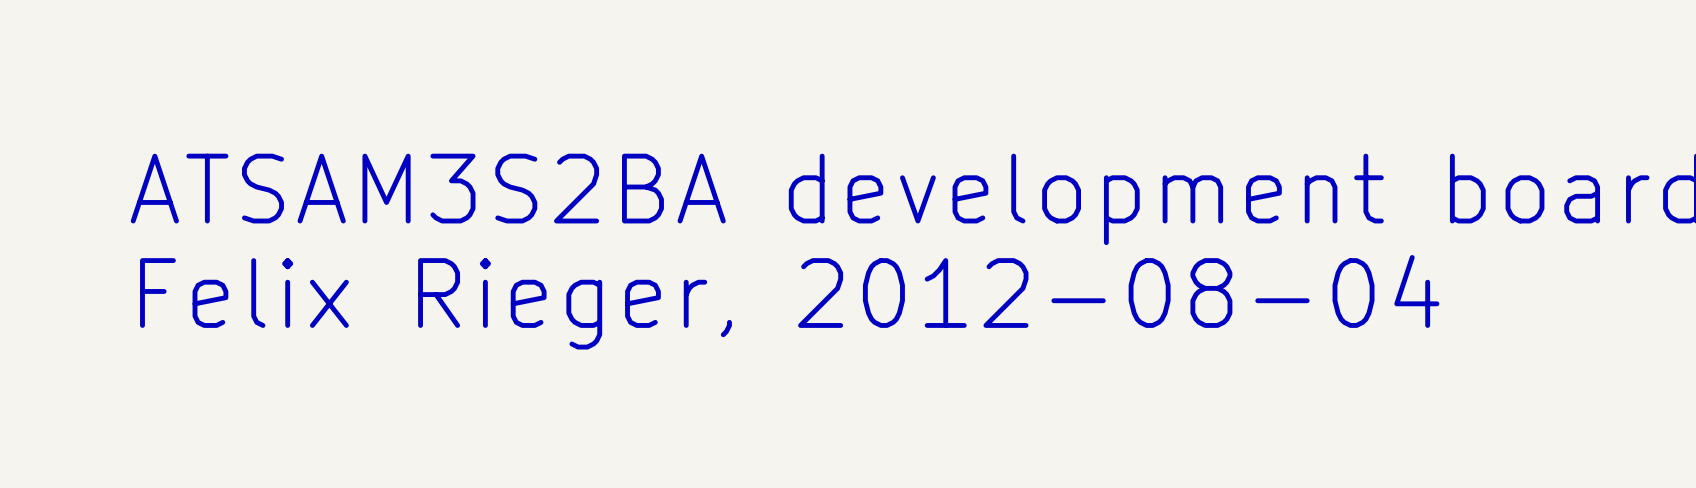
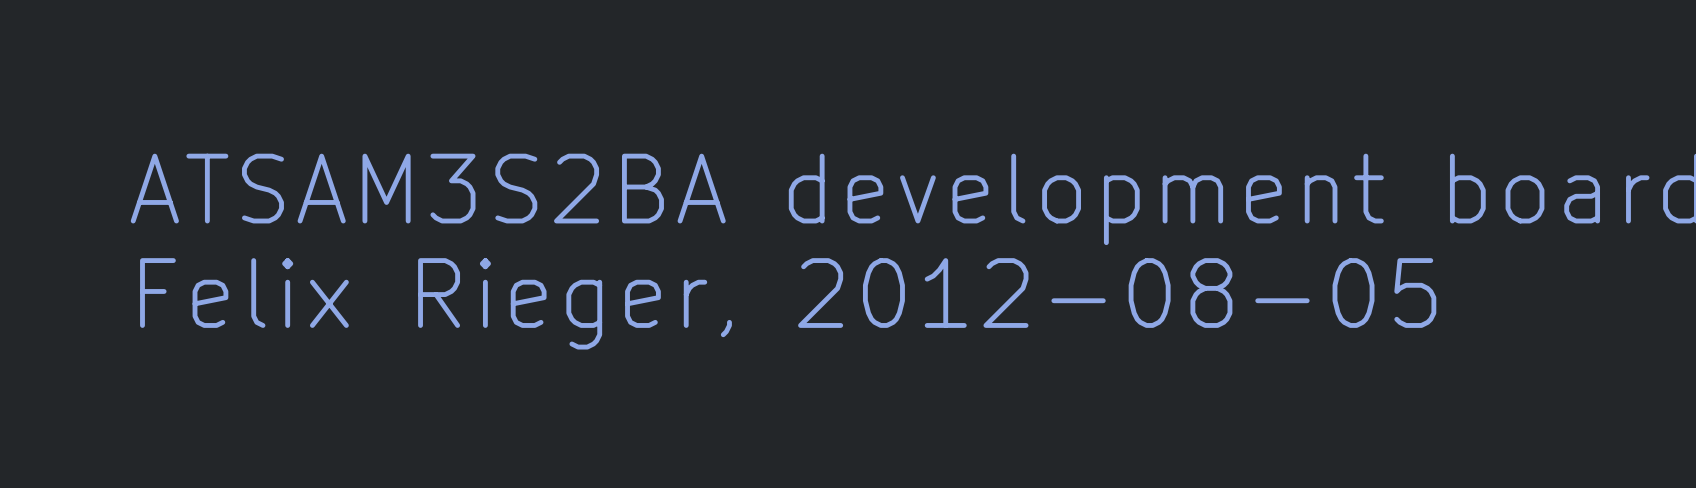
text: Felix Rieger, 2012-08-04 (789, 302) -> Felix Rieger, 2012-08-05 (788, 303)

